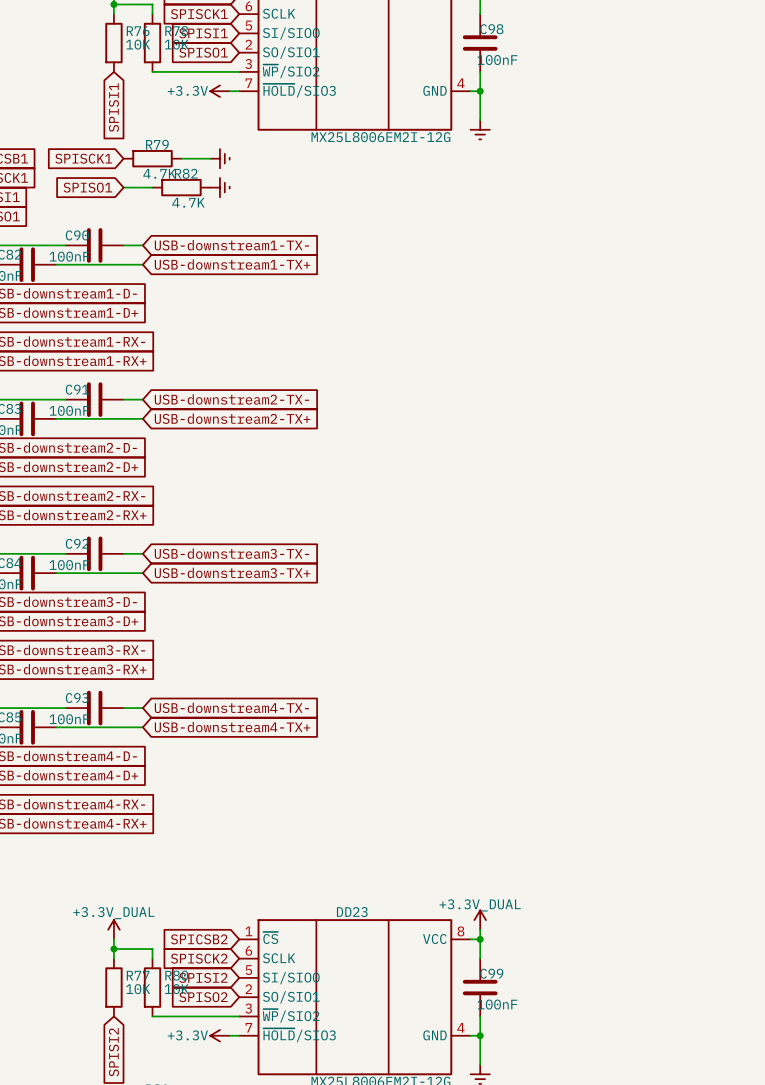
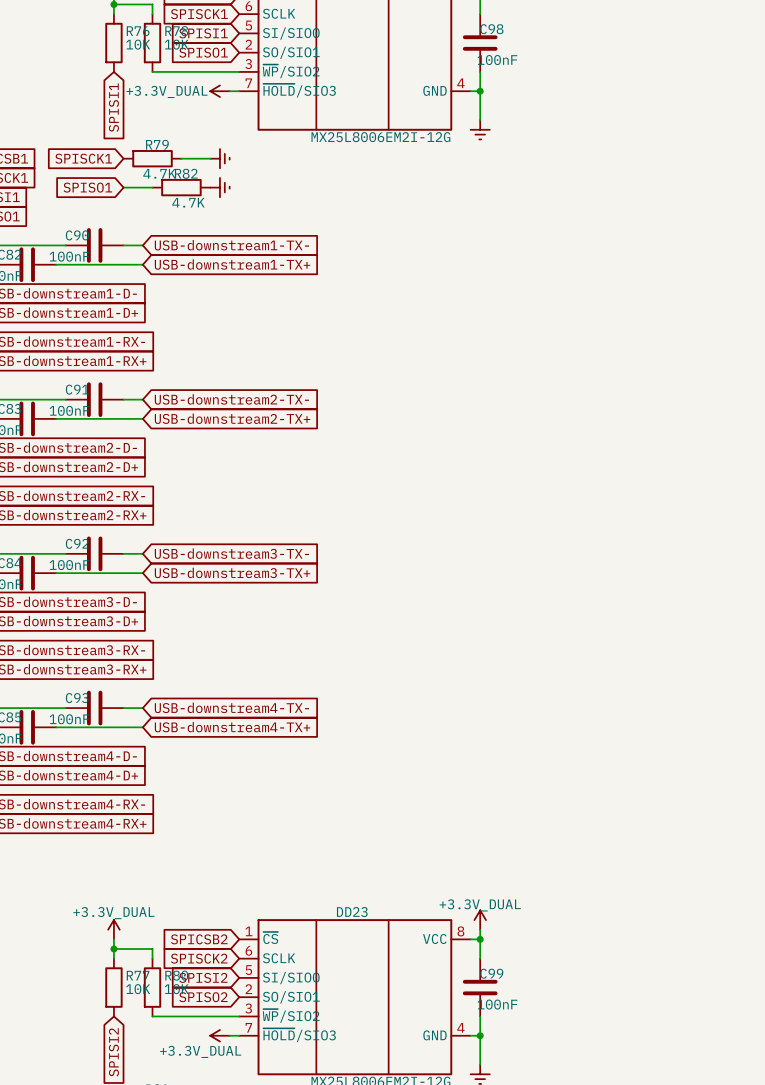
power symbol: +3.3V (219, 91) -> +3.3V_DUAL (219, 91)
power symbol: +3.3V (219, 1035) -> +3.3V_DUAL (219, 1035)

